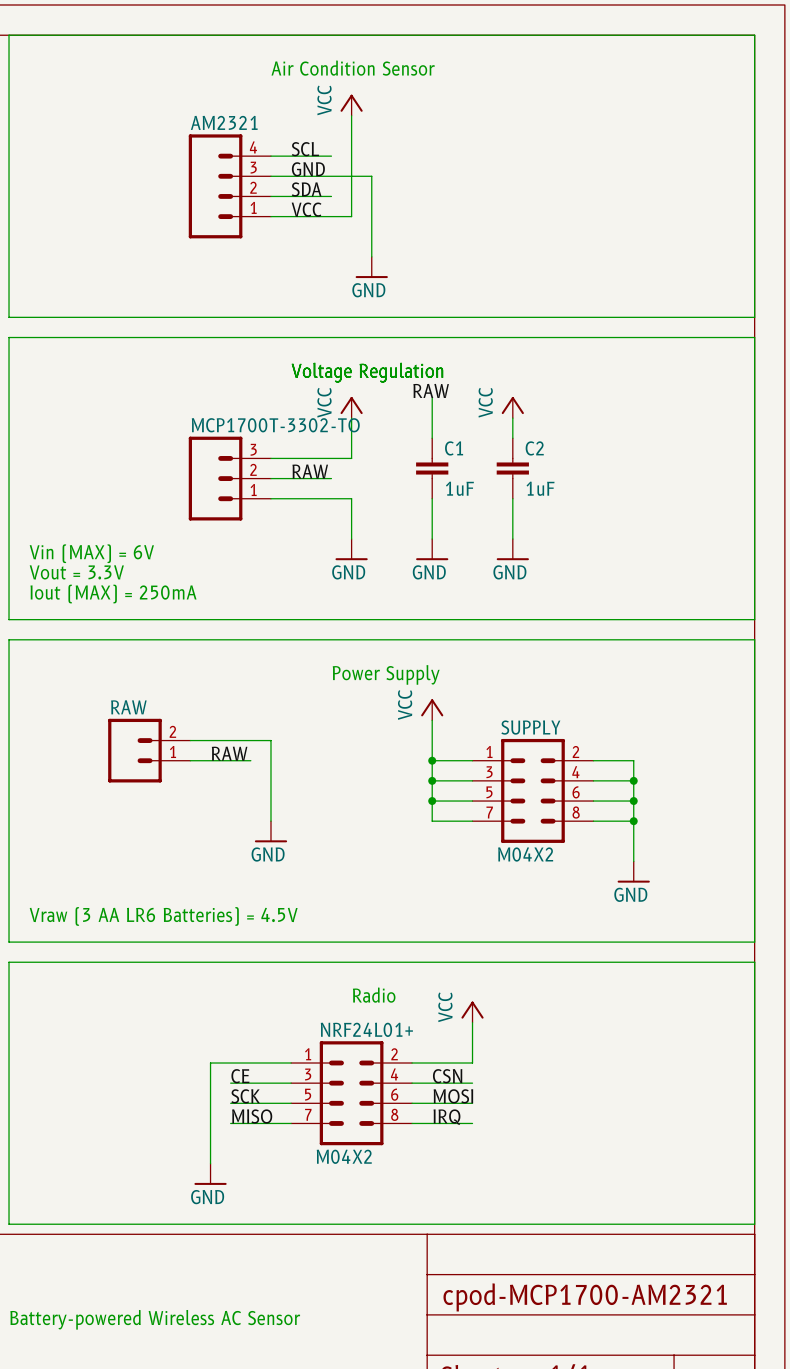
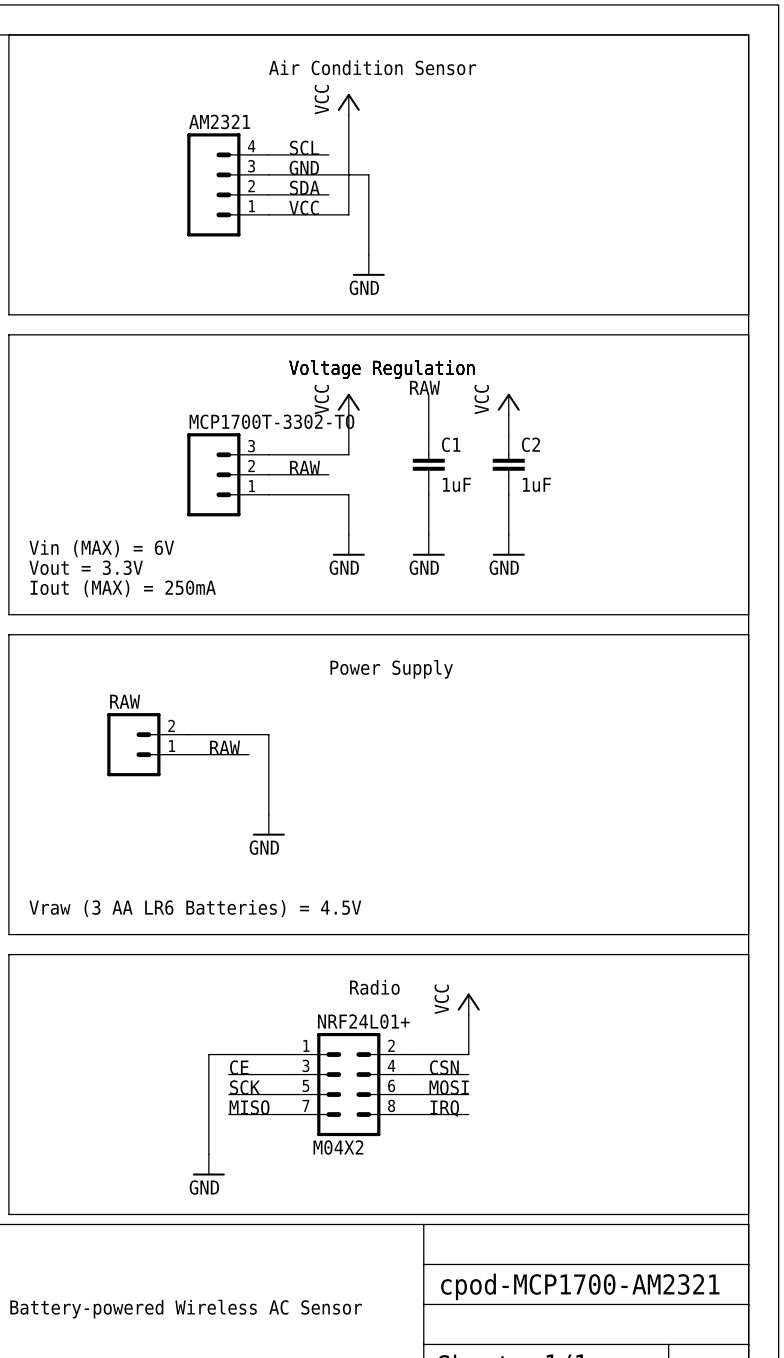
power symbol: VCC (432, 709) -> none
wire: (432, 720) (432, 821) (472, 821) -> none
wire: (432, 760) (472, 760) -> none
junction: (432, 760) -> none
wire: (593, 760) (633, 760) (633, 861) -> none
wire: (432, 780) (472, 780) -> none
junction: (432, 780) -> none
wire: (593, 780) (633, 780) -> none
junction: (633, 780) -> none
SUPPLY: M04X2 (532, 790) -> none
wire: (432, 801) (472, 801) -> none
junction: (432, 801) -> none
wire: (593, 801) (633, 801) -> none
junction: (633, 801) -> none
wire: (593, 821) (633, 821) -> none
junction: (633, 821) -> none
power symbol: GND (633, 872) -> none

